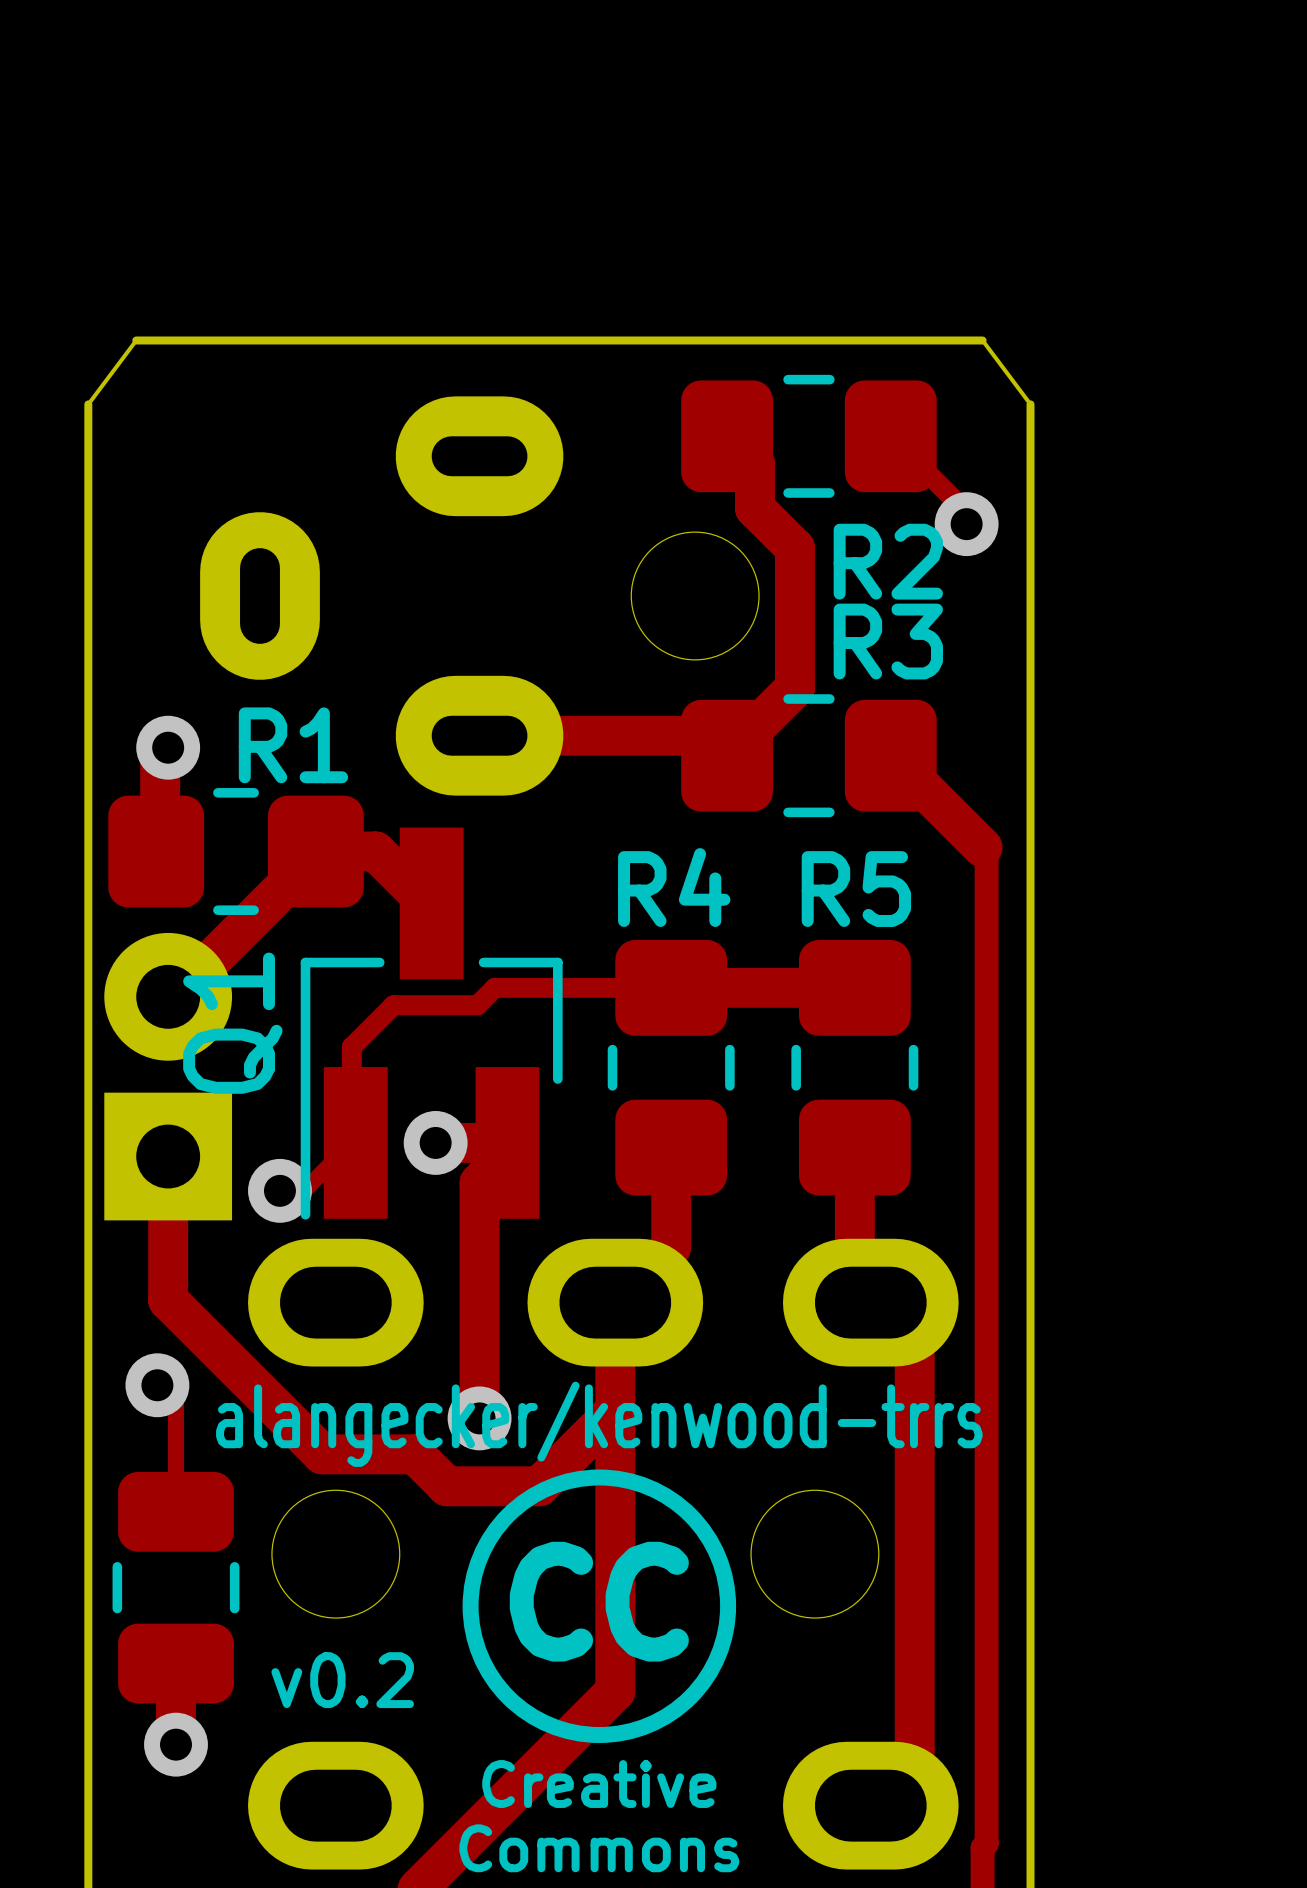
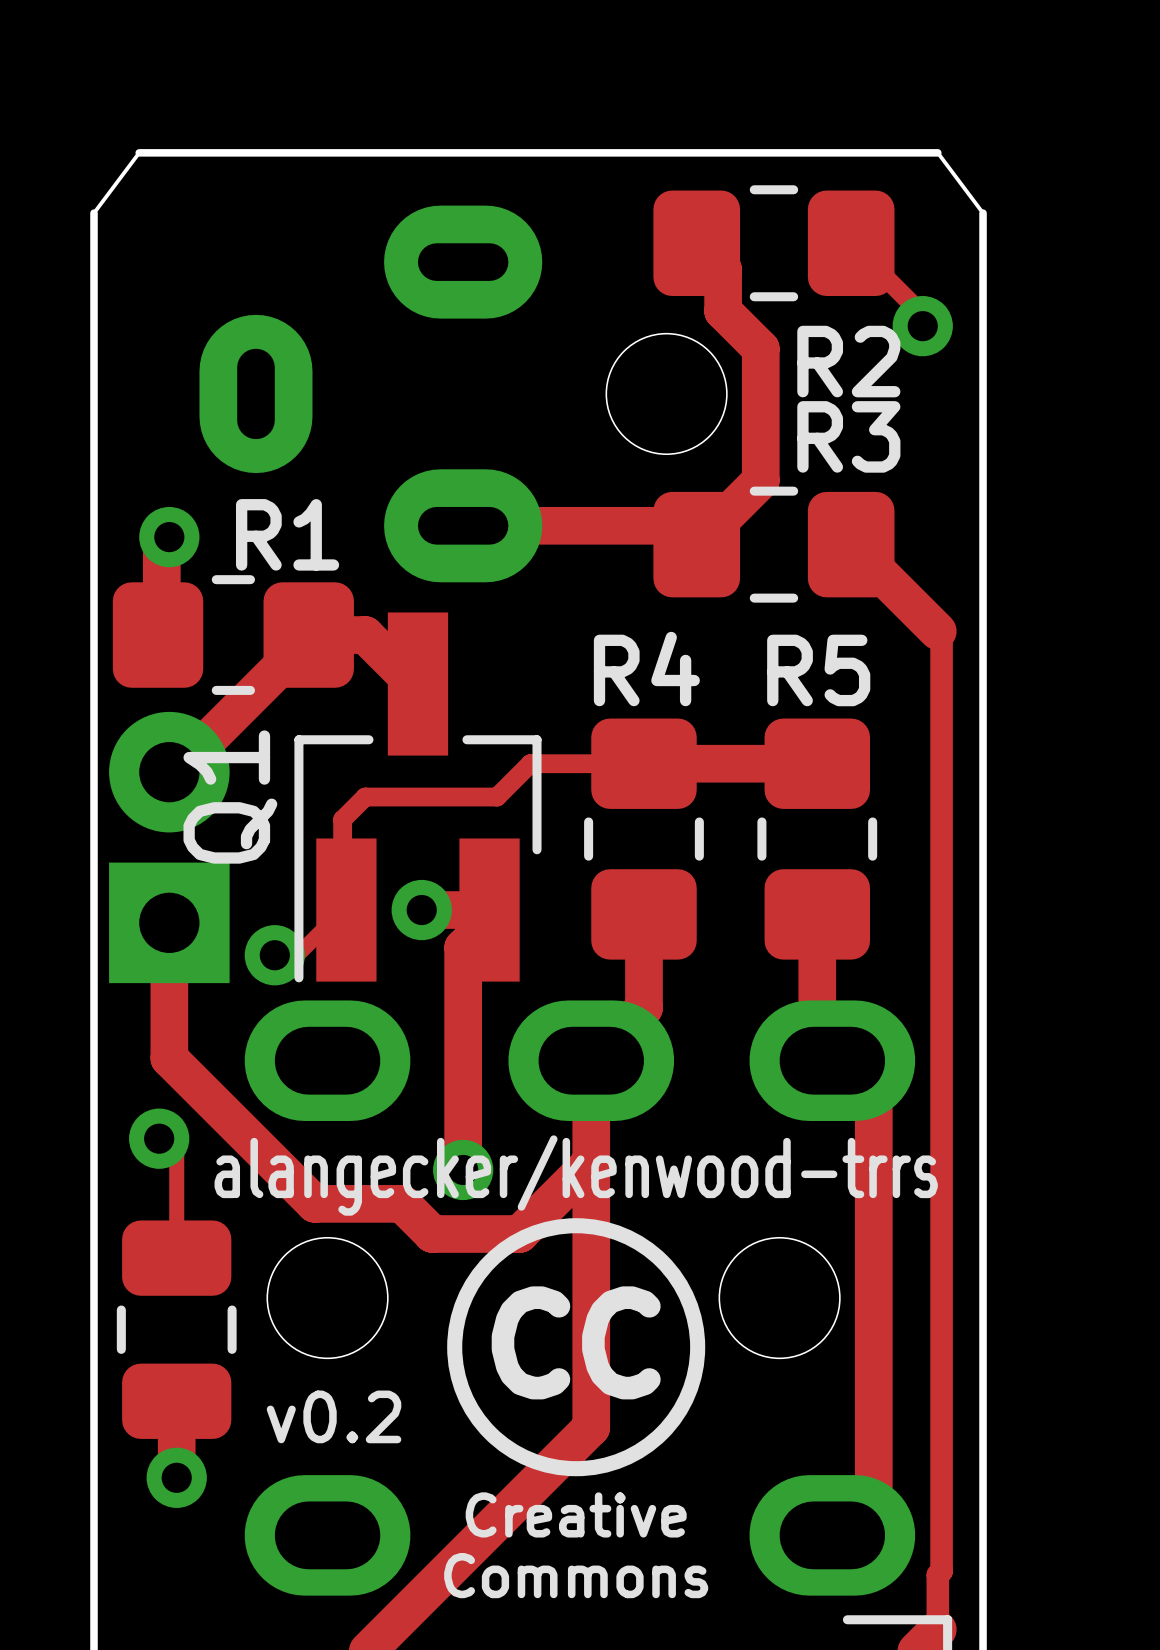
track: (550, 987) (494, 987) (477, 1005) (393, 1005) (375, 1023) -> (530, 763) (497, 797) (365, 797)

